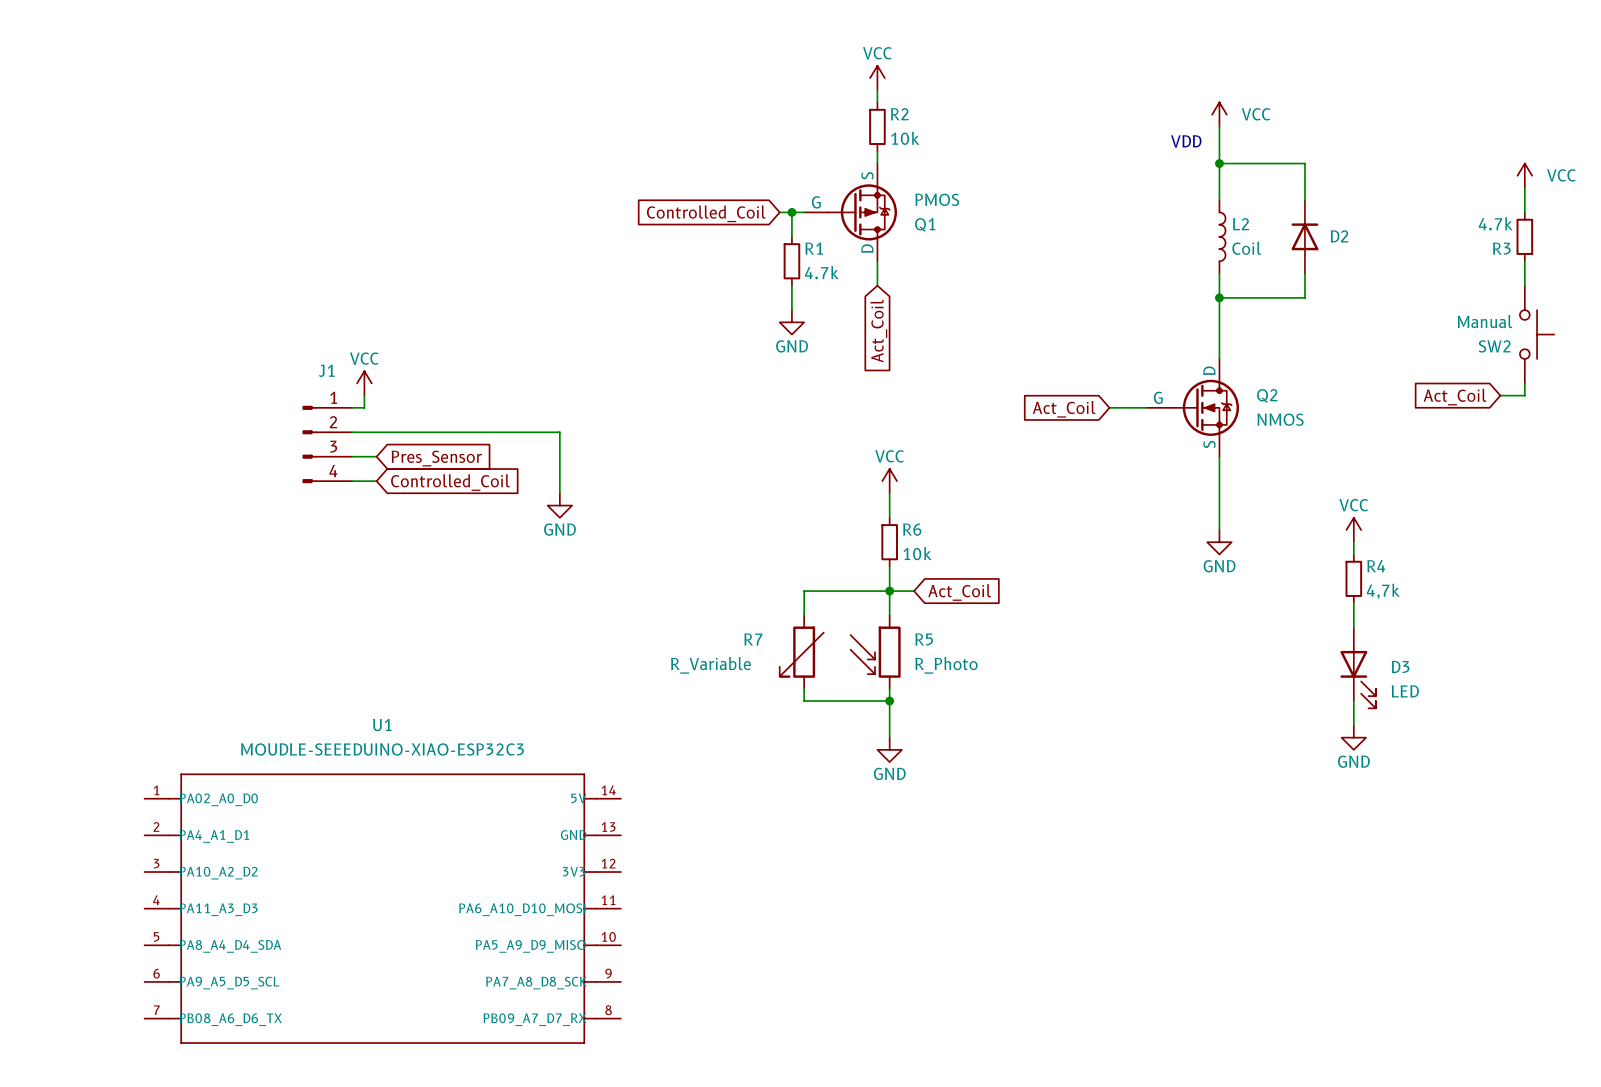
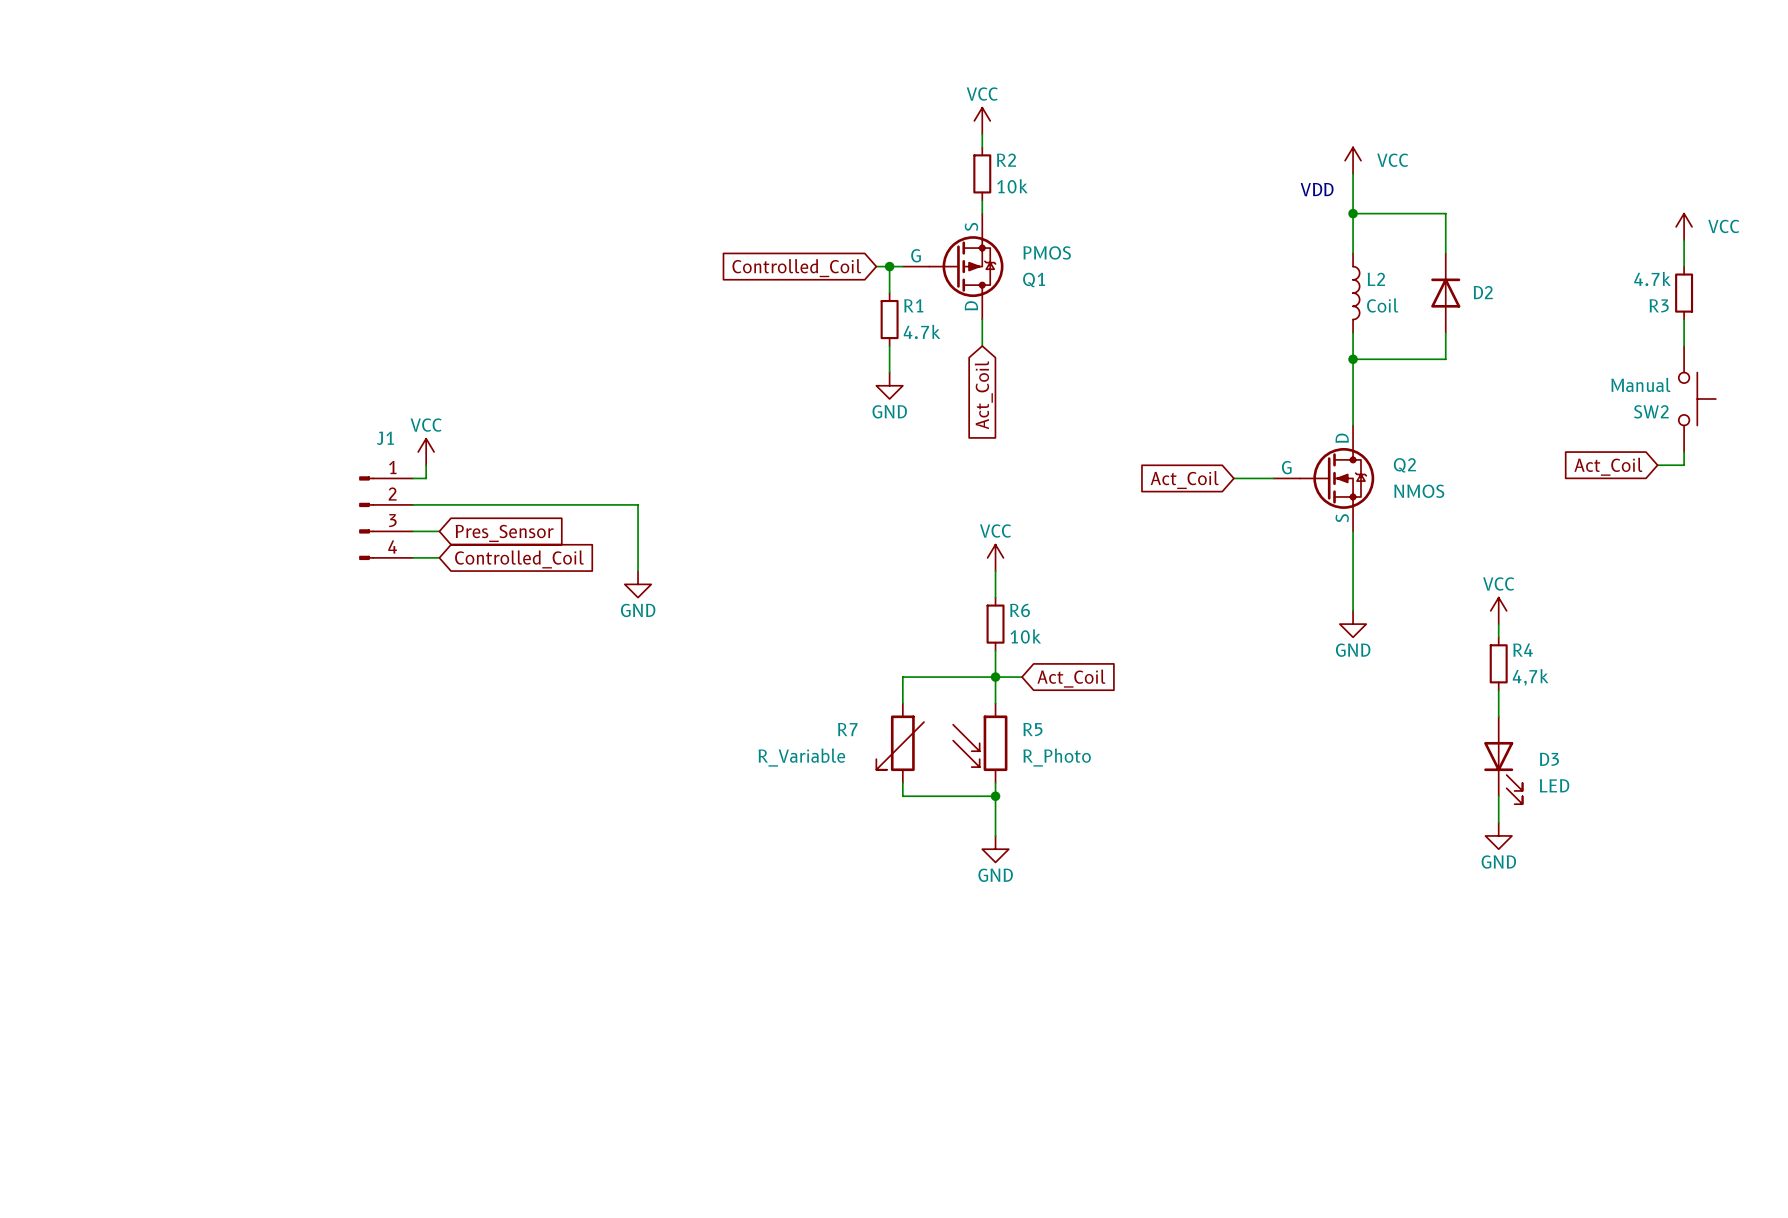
U1: MOUDLE-SEEEDUINO-XIAO-ESP32C3 (382, 908) -> none

